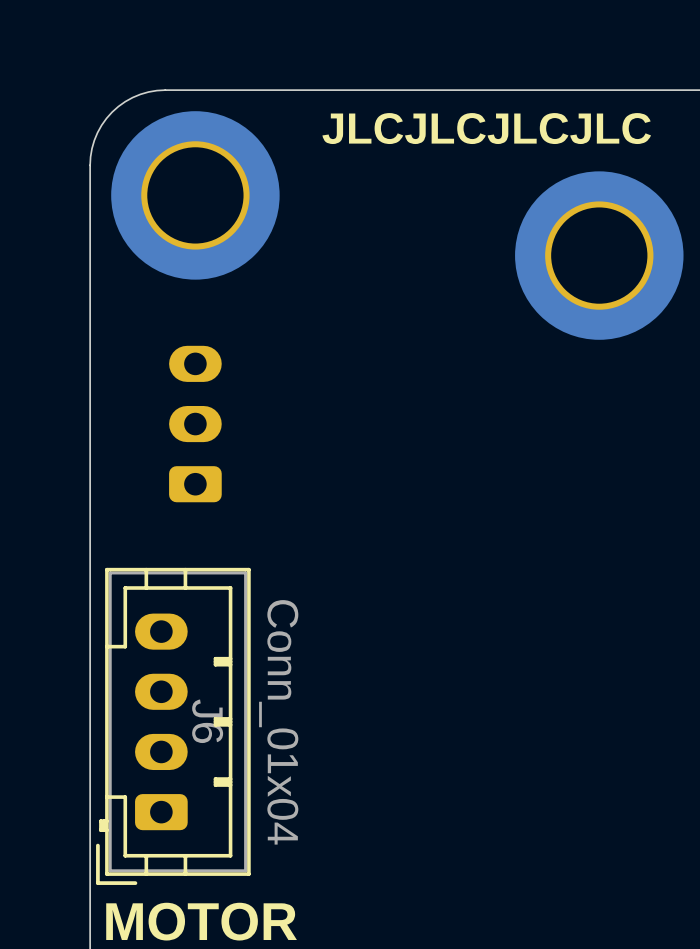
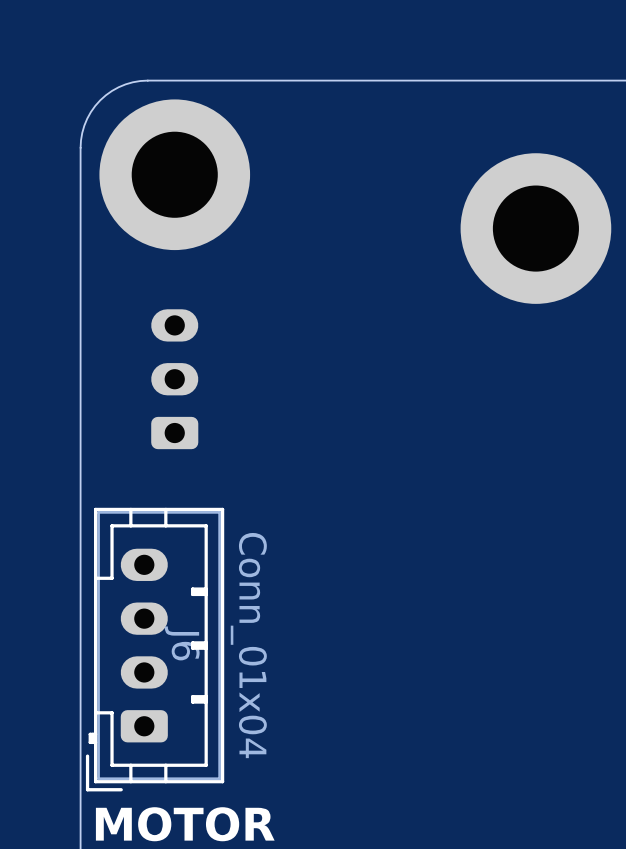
text: JLCJLCJLCJLC (486, 128) -> none

